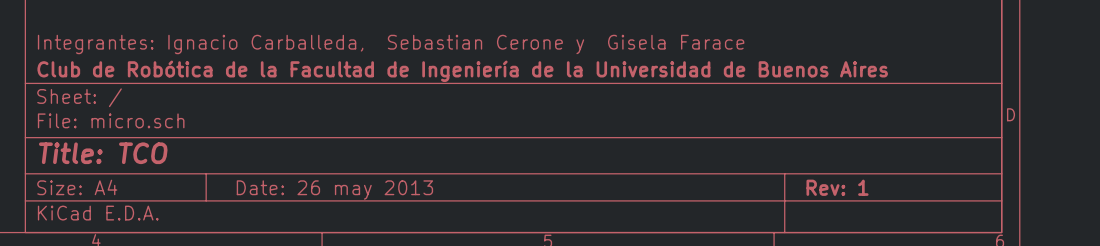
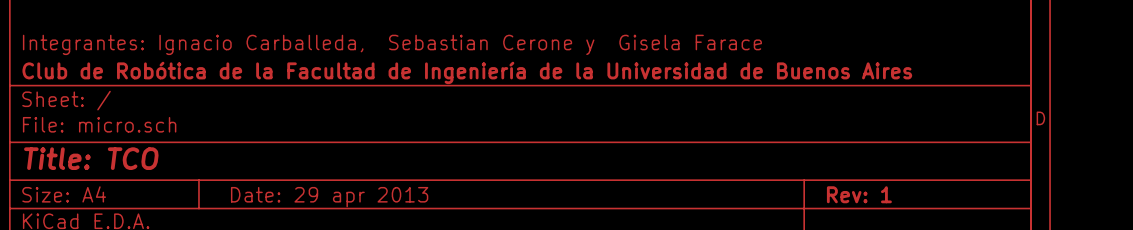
title block: Date: 26 may 2013 (334, 190) -> Date: 29 apr 2013 (329, 197)

